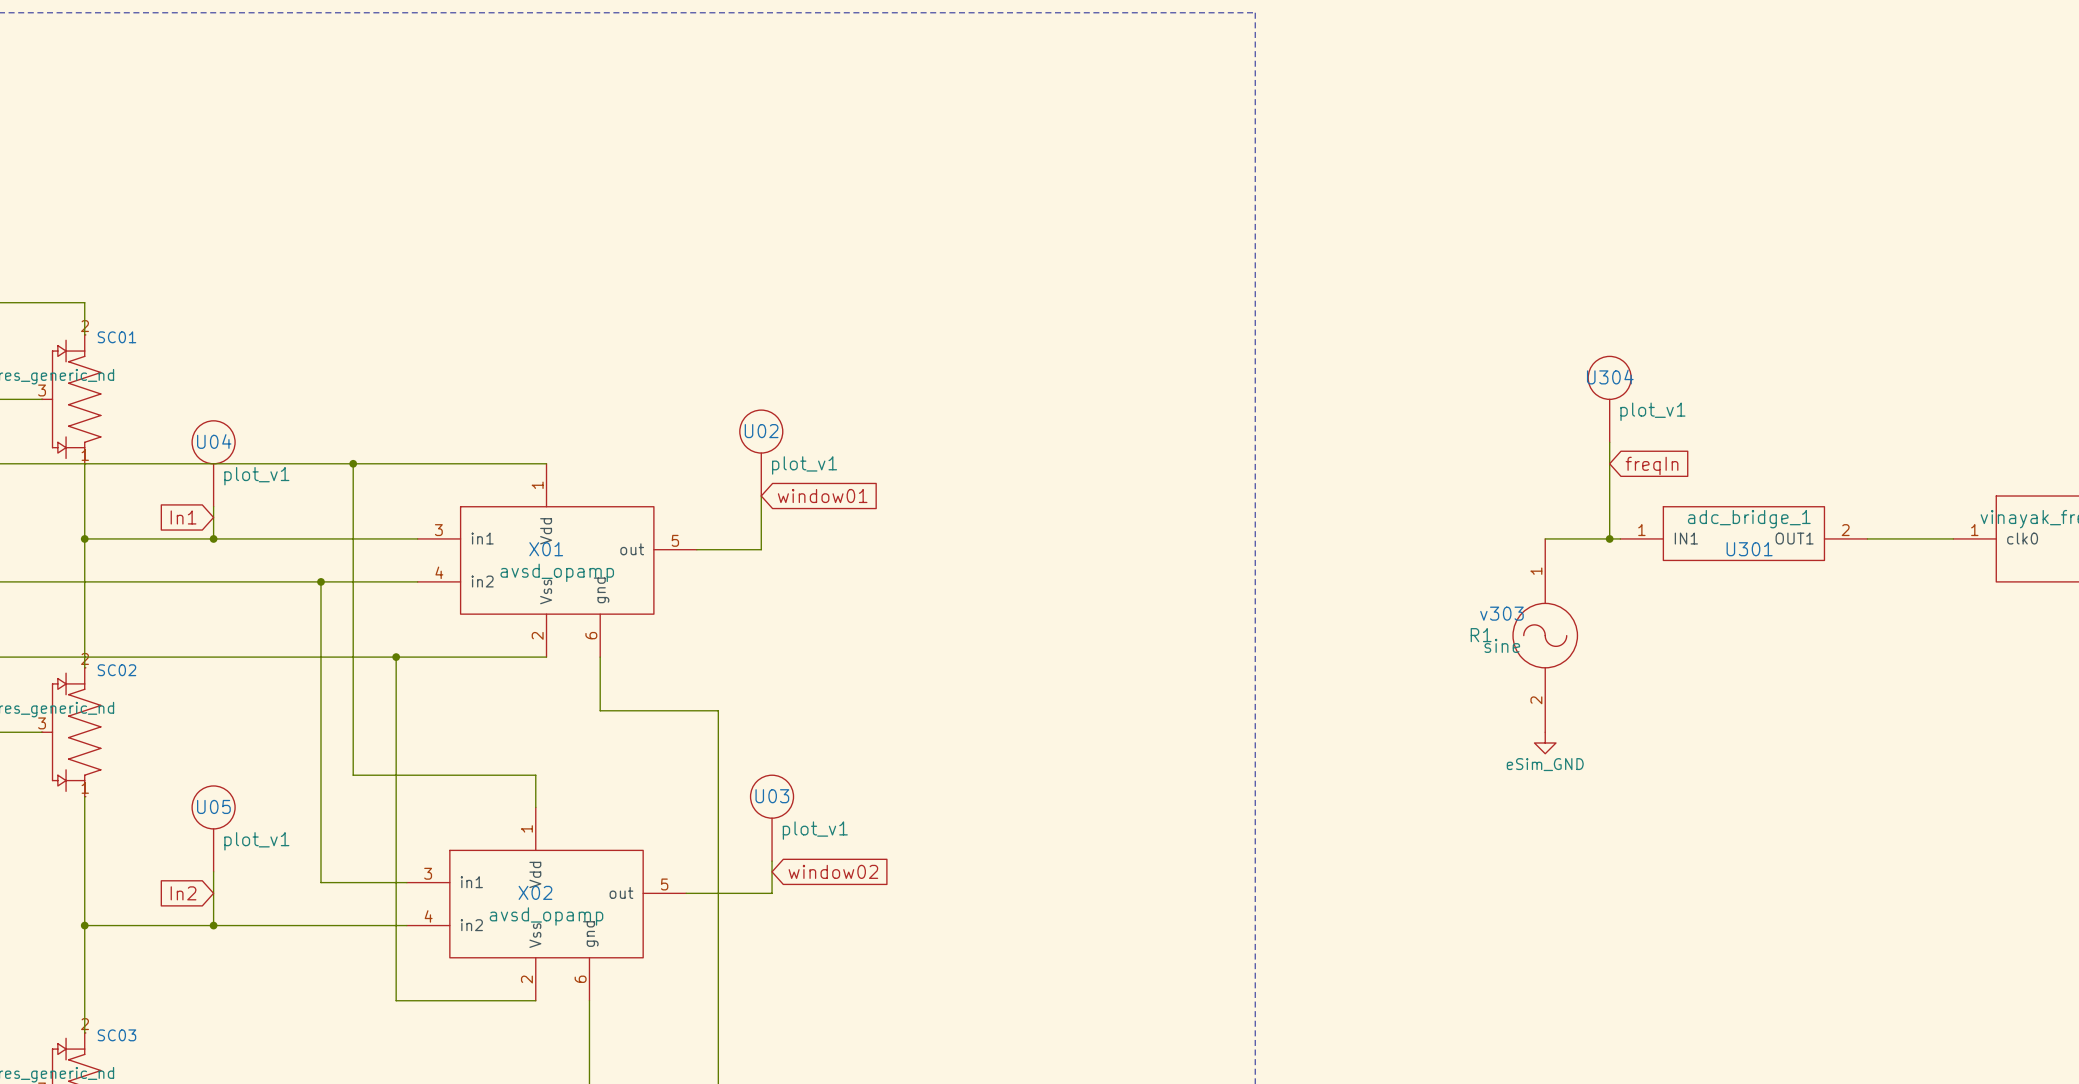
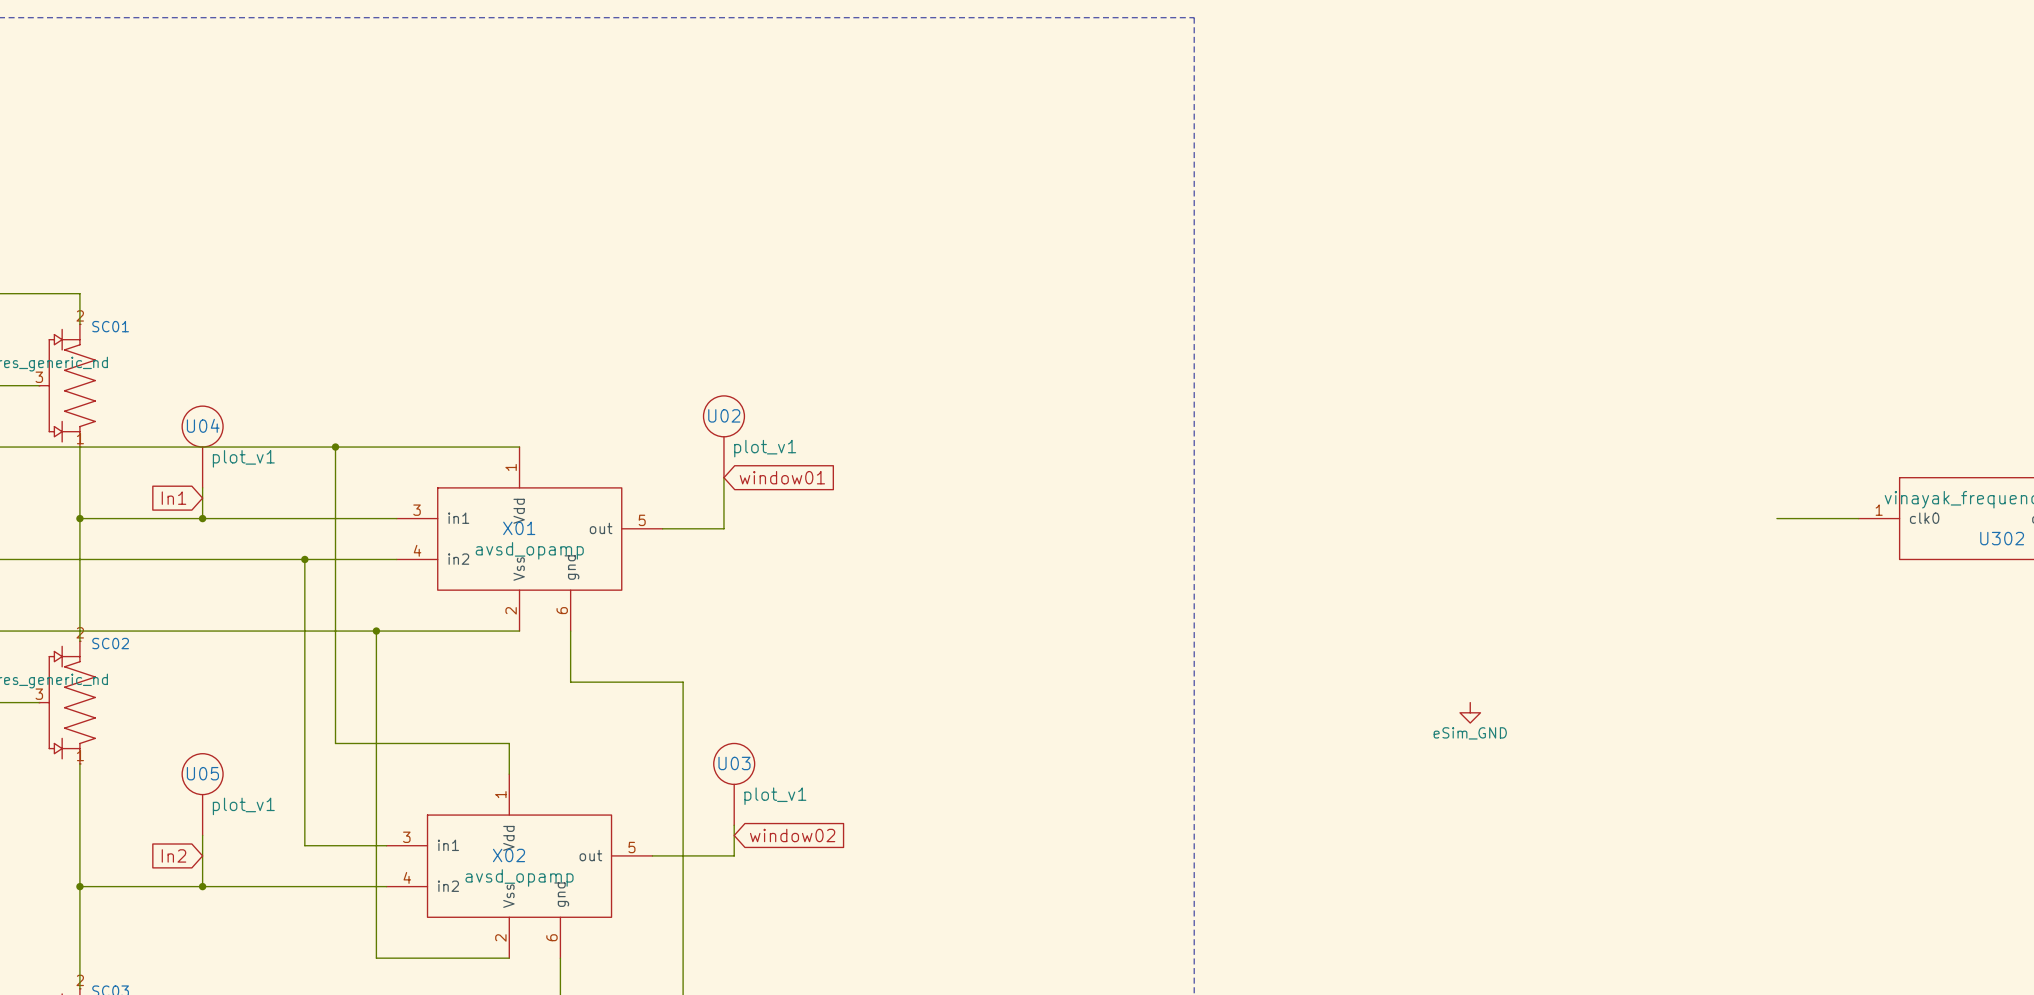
U304: plot_v1 (1609, 399) -> none
wire: (1609, 442) (1609, 538) -> none
global label: freqIn (1652, 465) -> none
U301: adc_bridge_1 (1743, 533) -> none
wire: (1545, 538) (1620, 538) -> none
junction: (1609, 538) -> none
v303: sine (1545, 635) -> none

